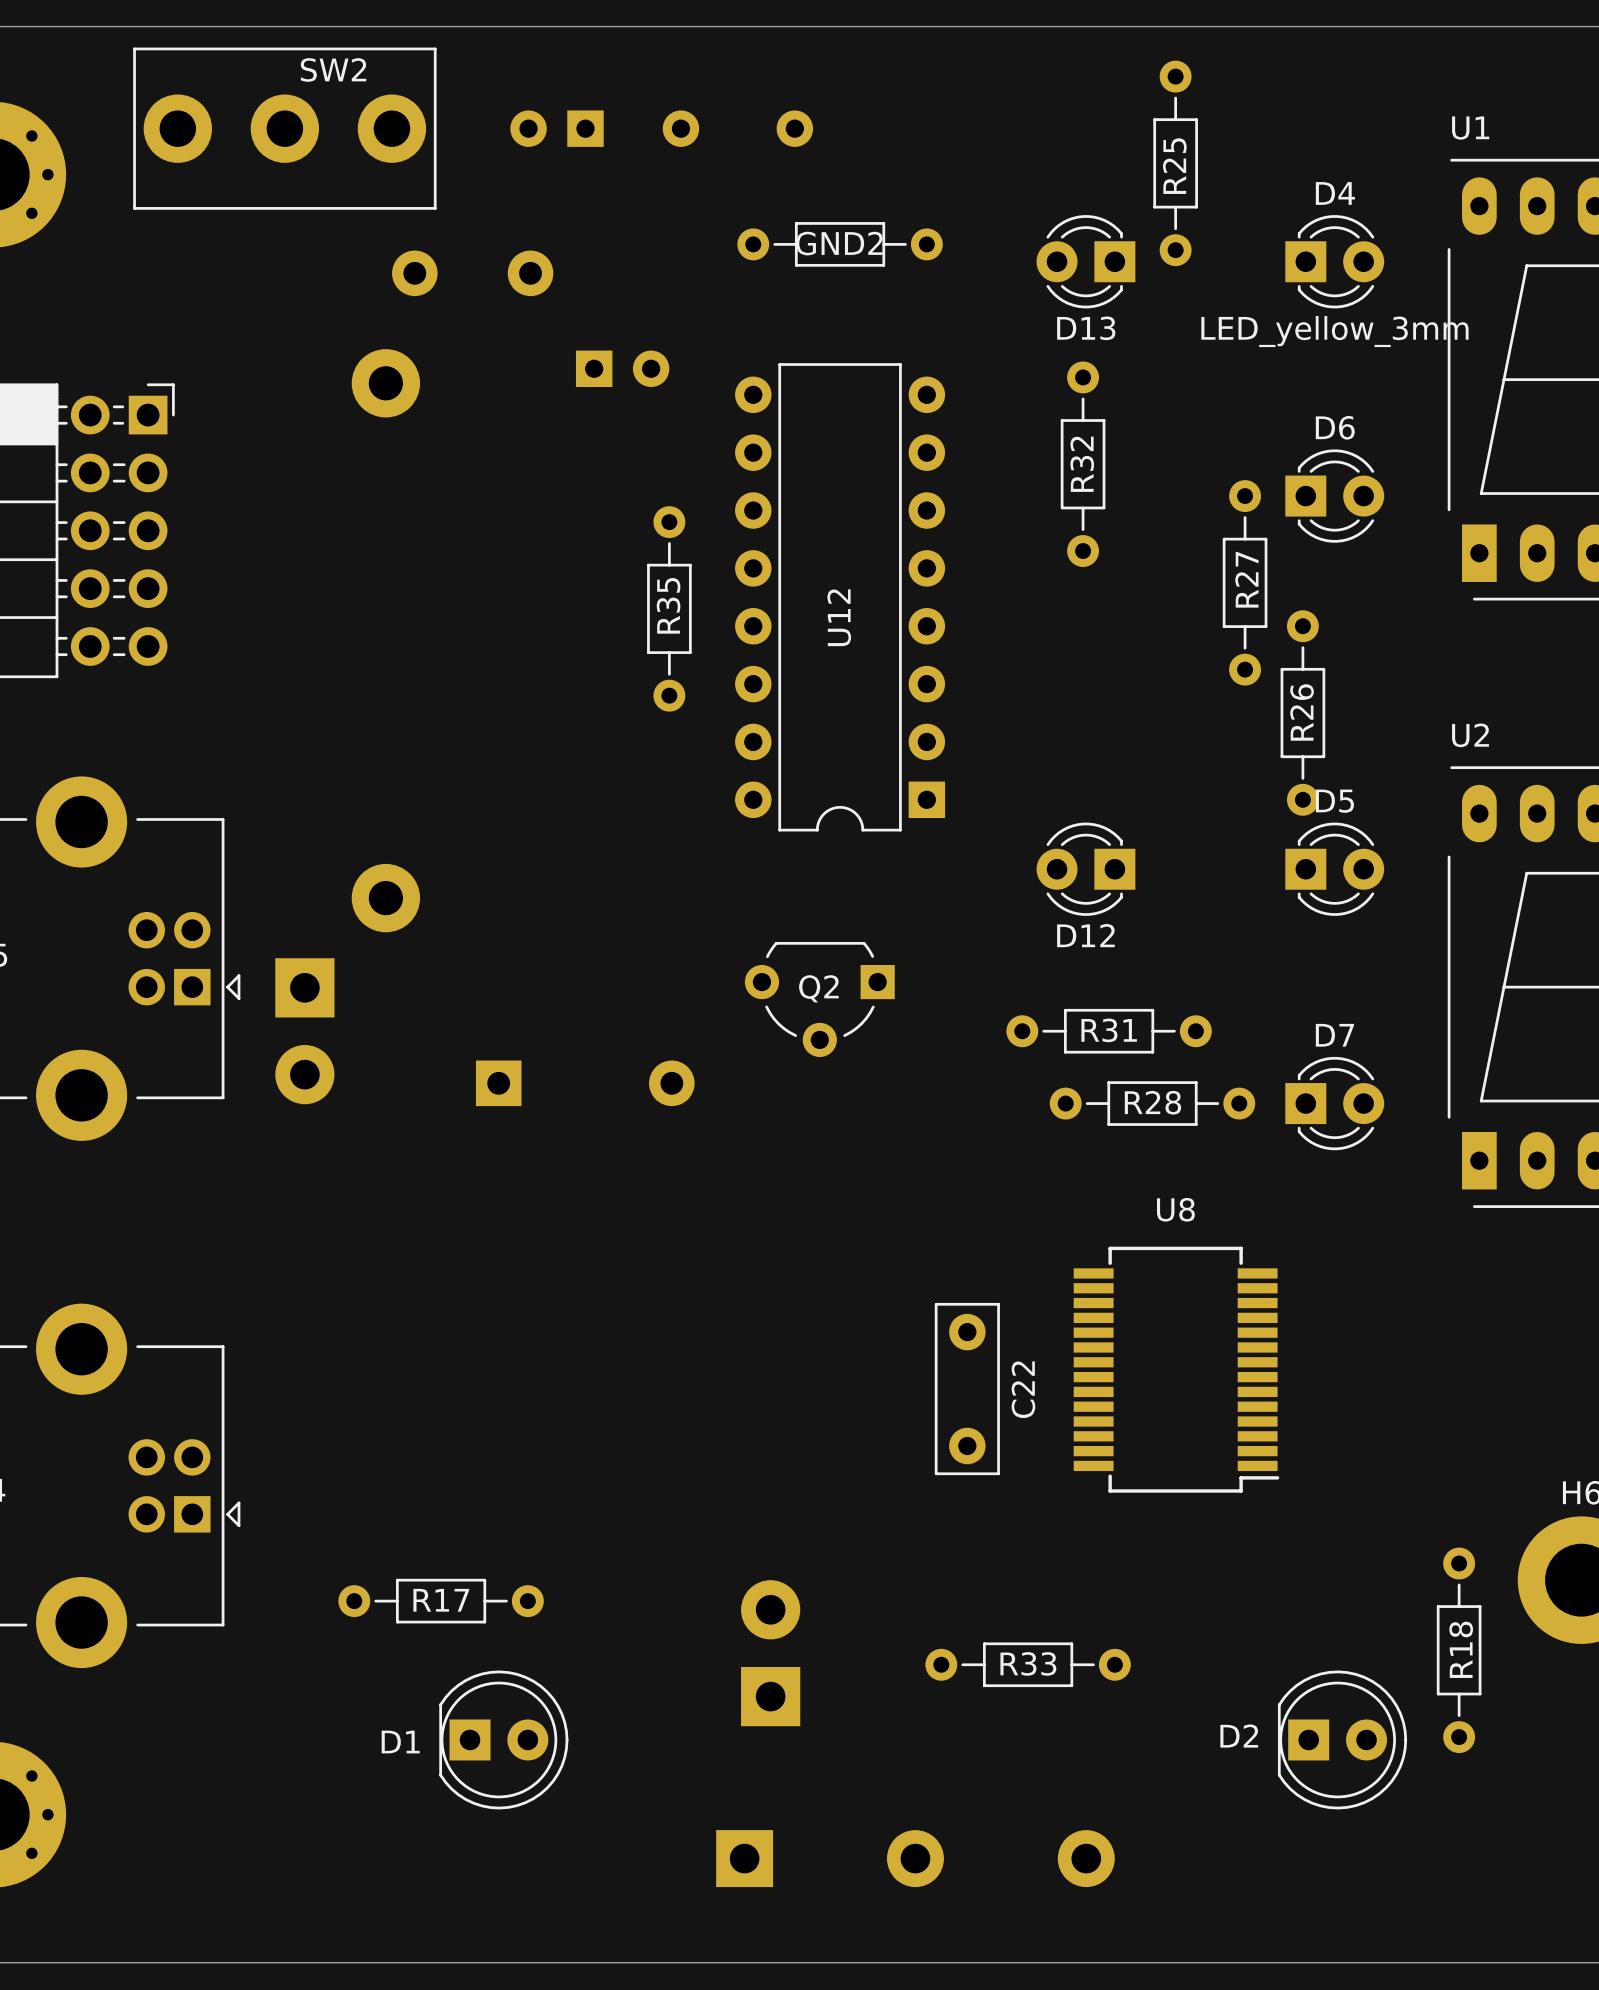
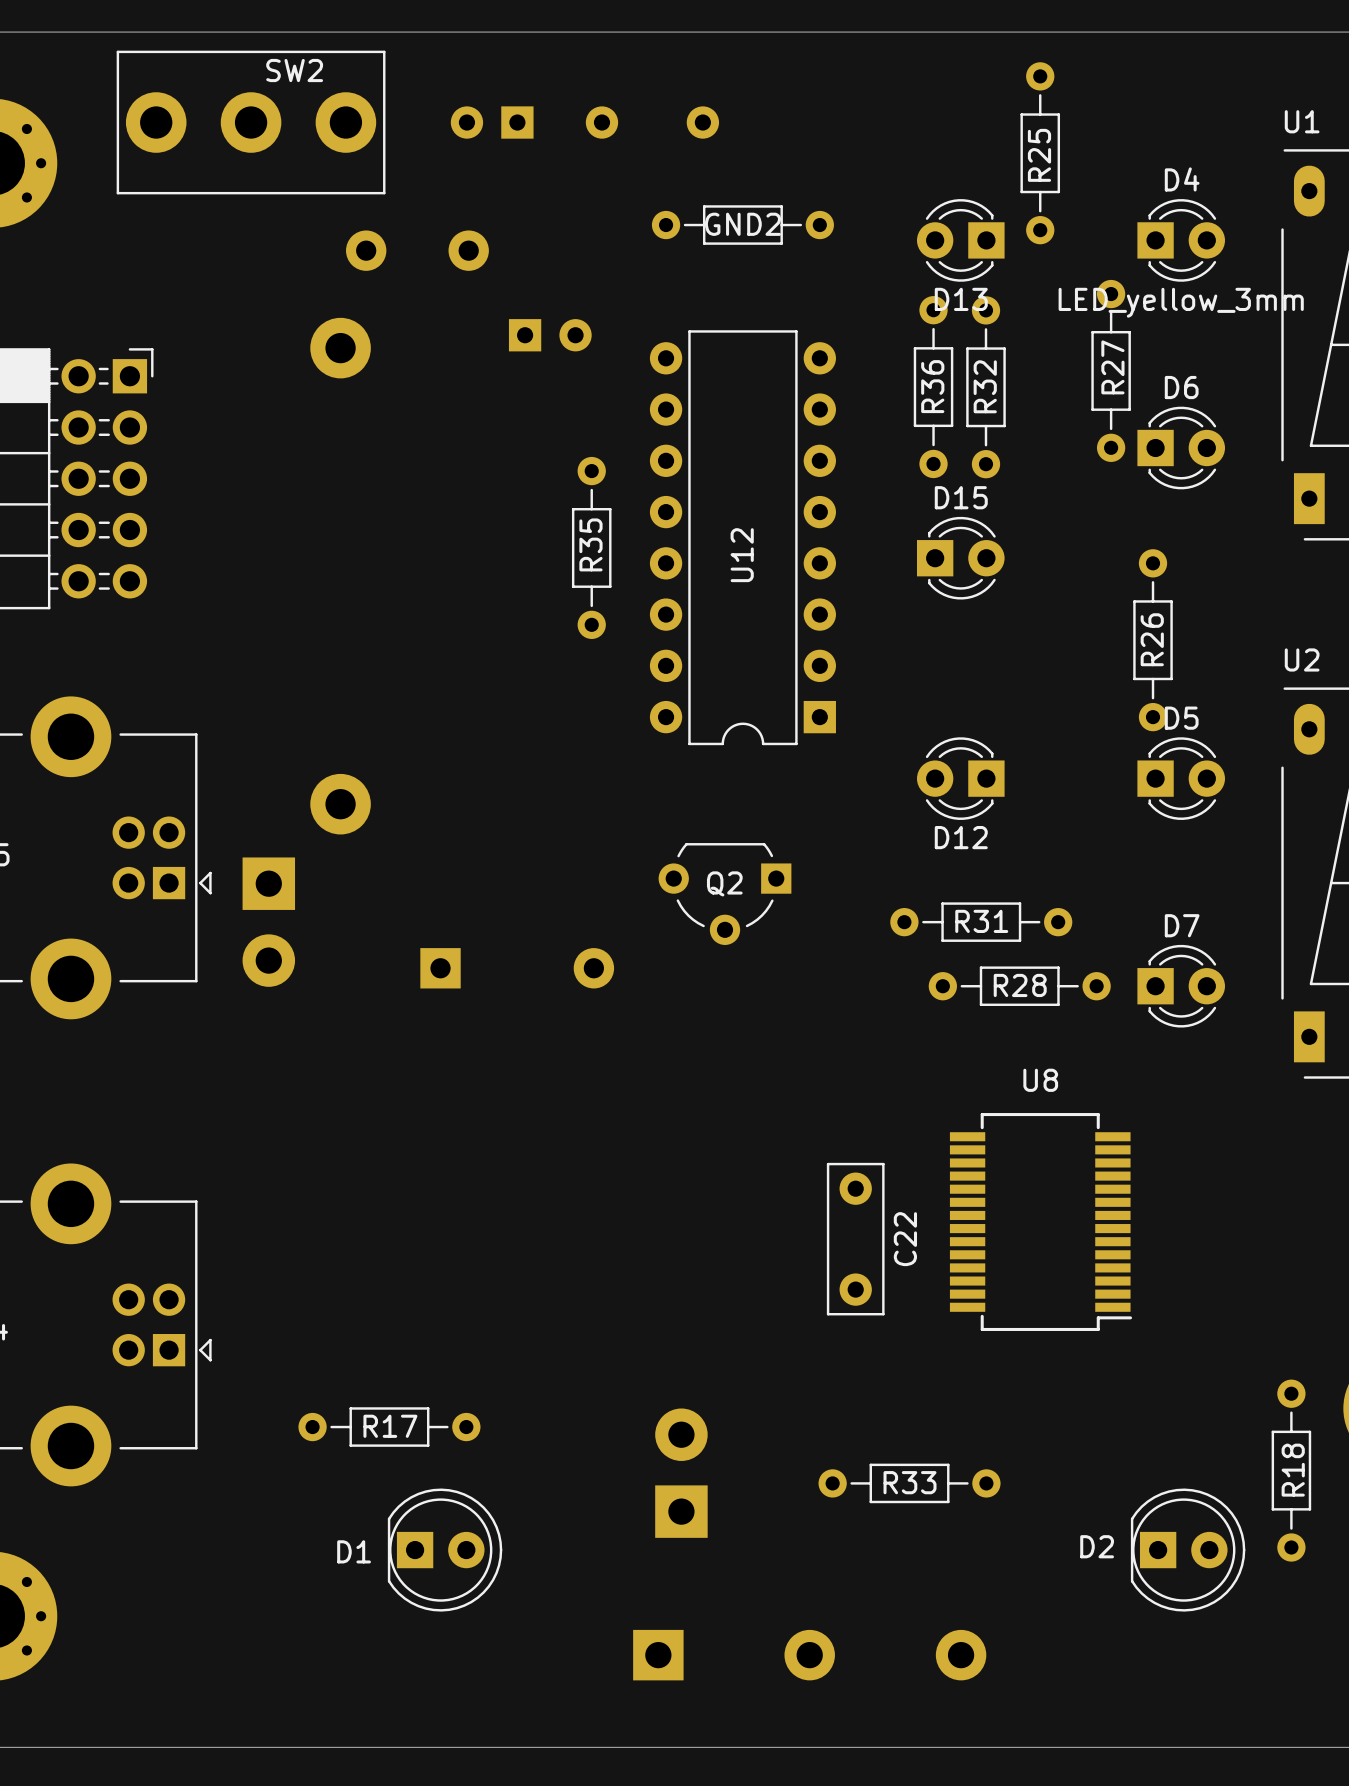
R36: none -> (933, 387)
R32 position: (1083, 464) -> (985, 387)
R27 position: (1245, 582) -> (1111, 370)
D15: none -> (960, 558)

